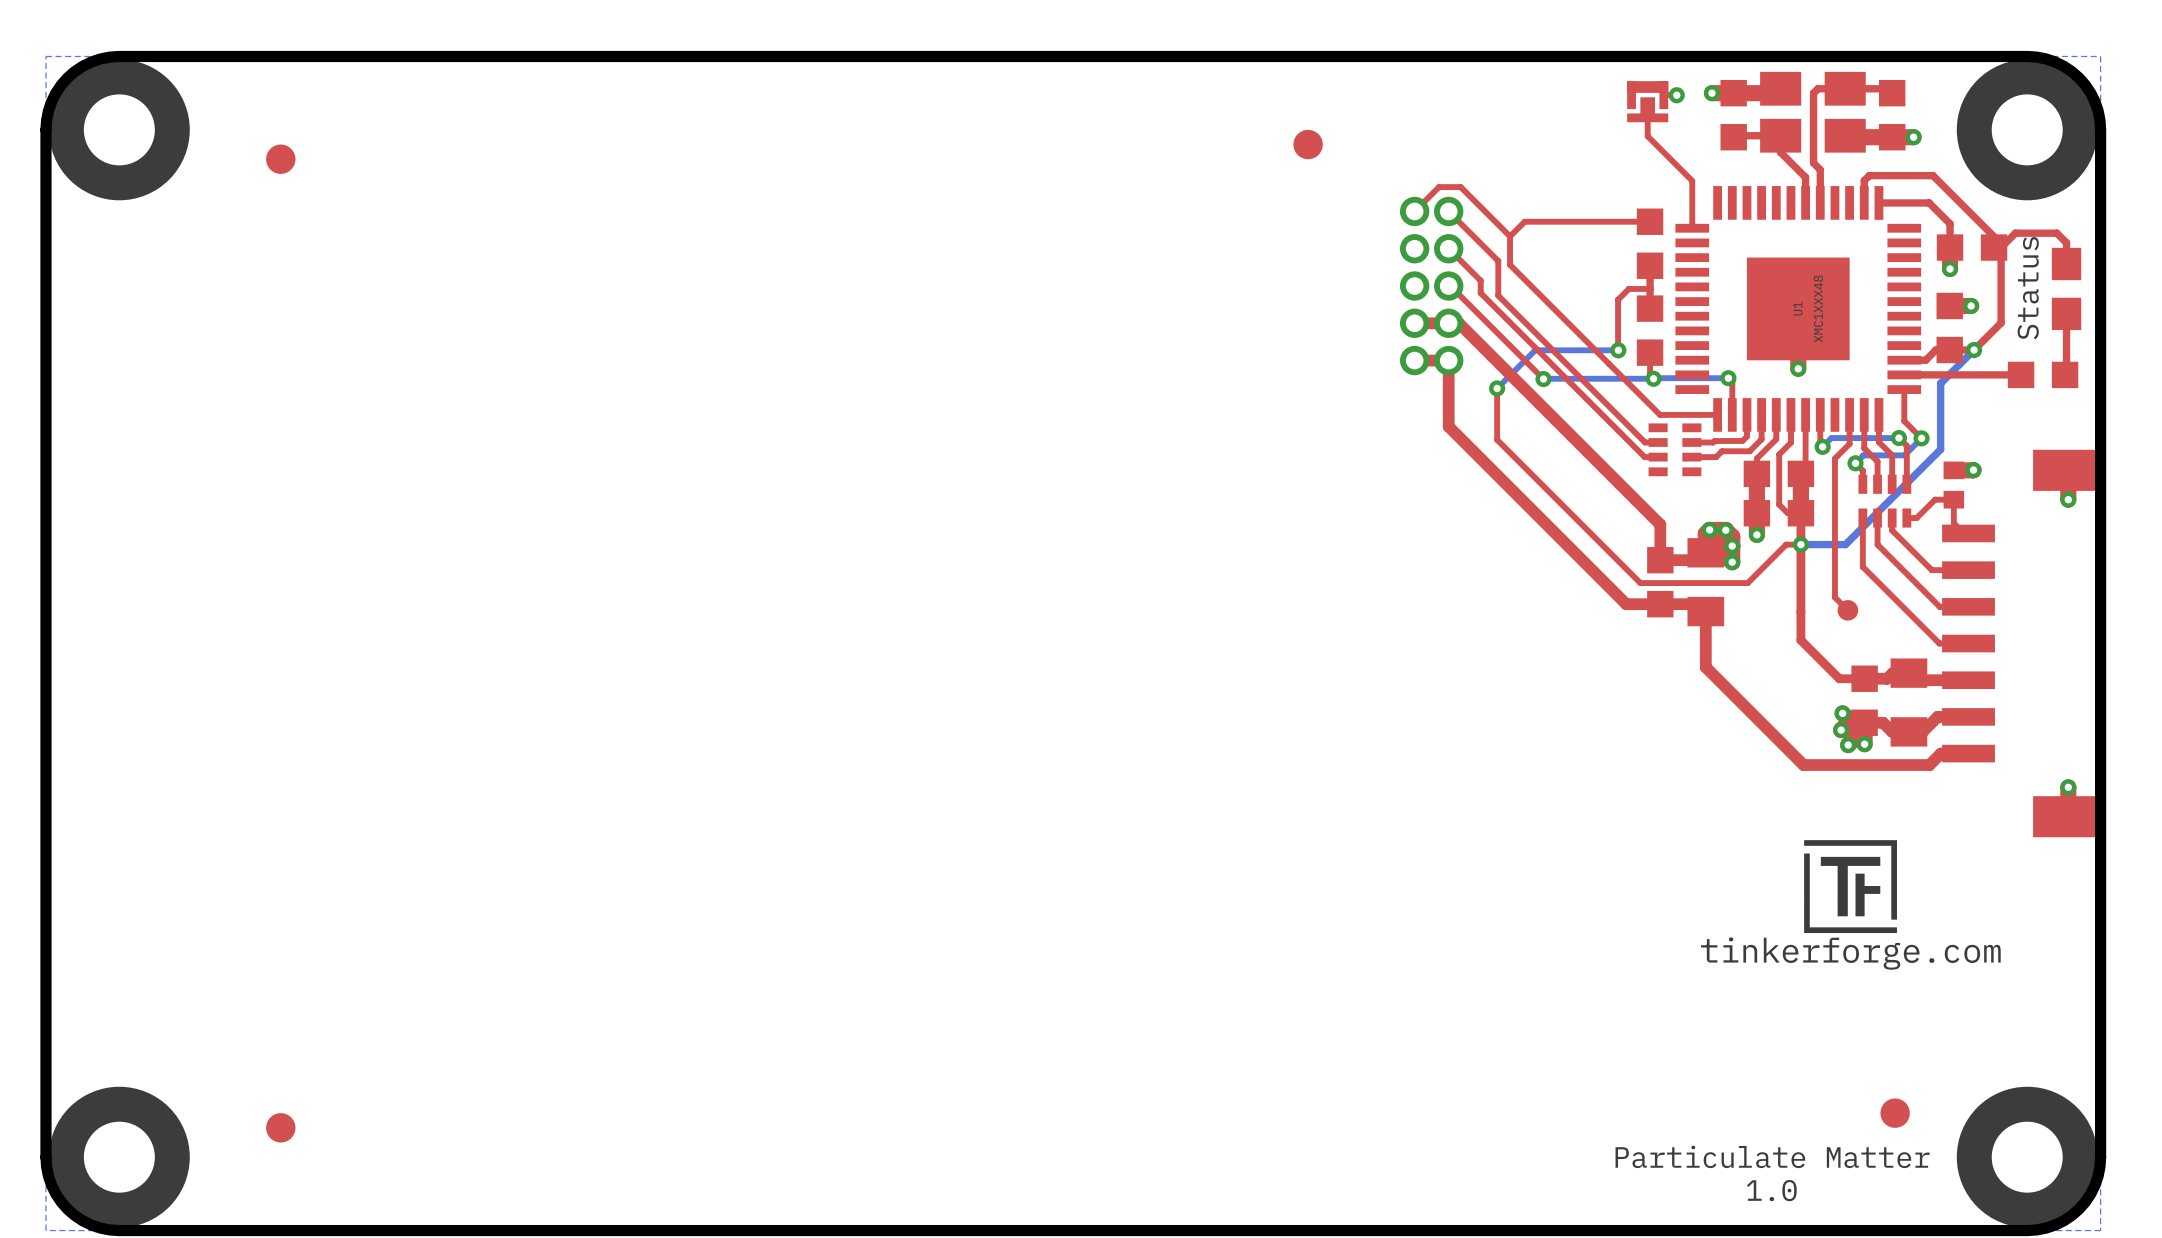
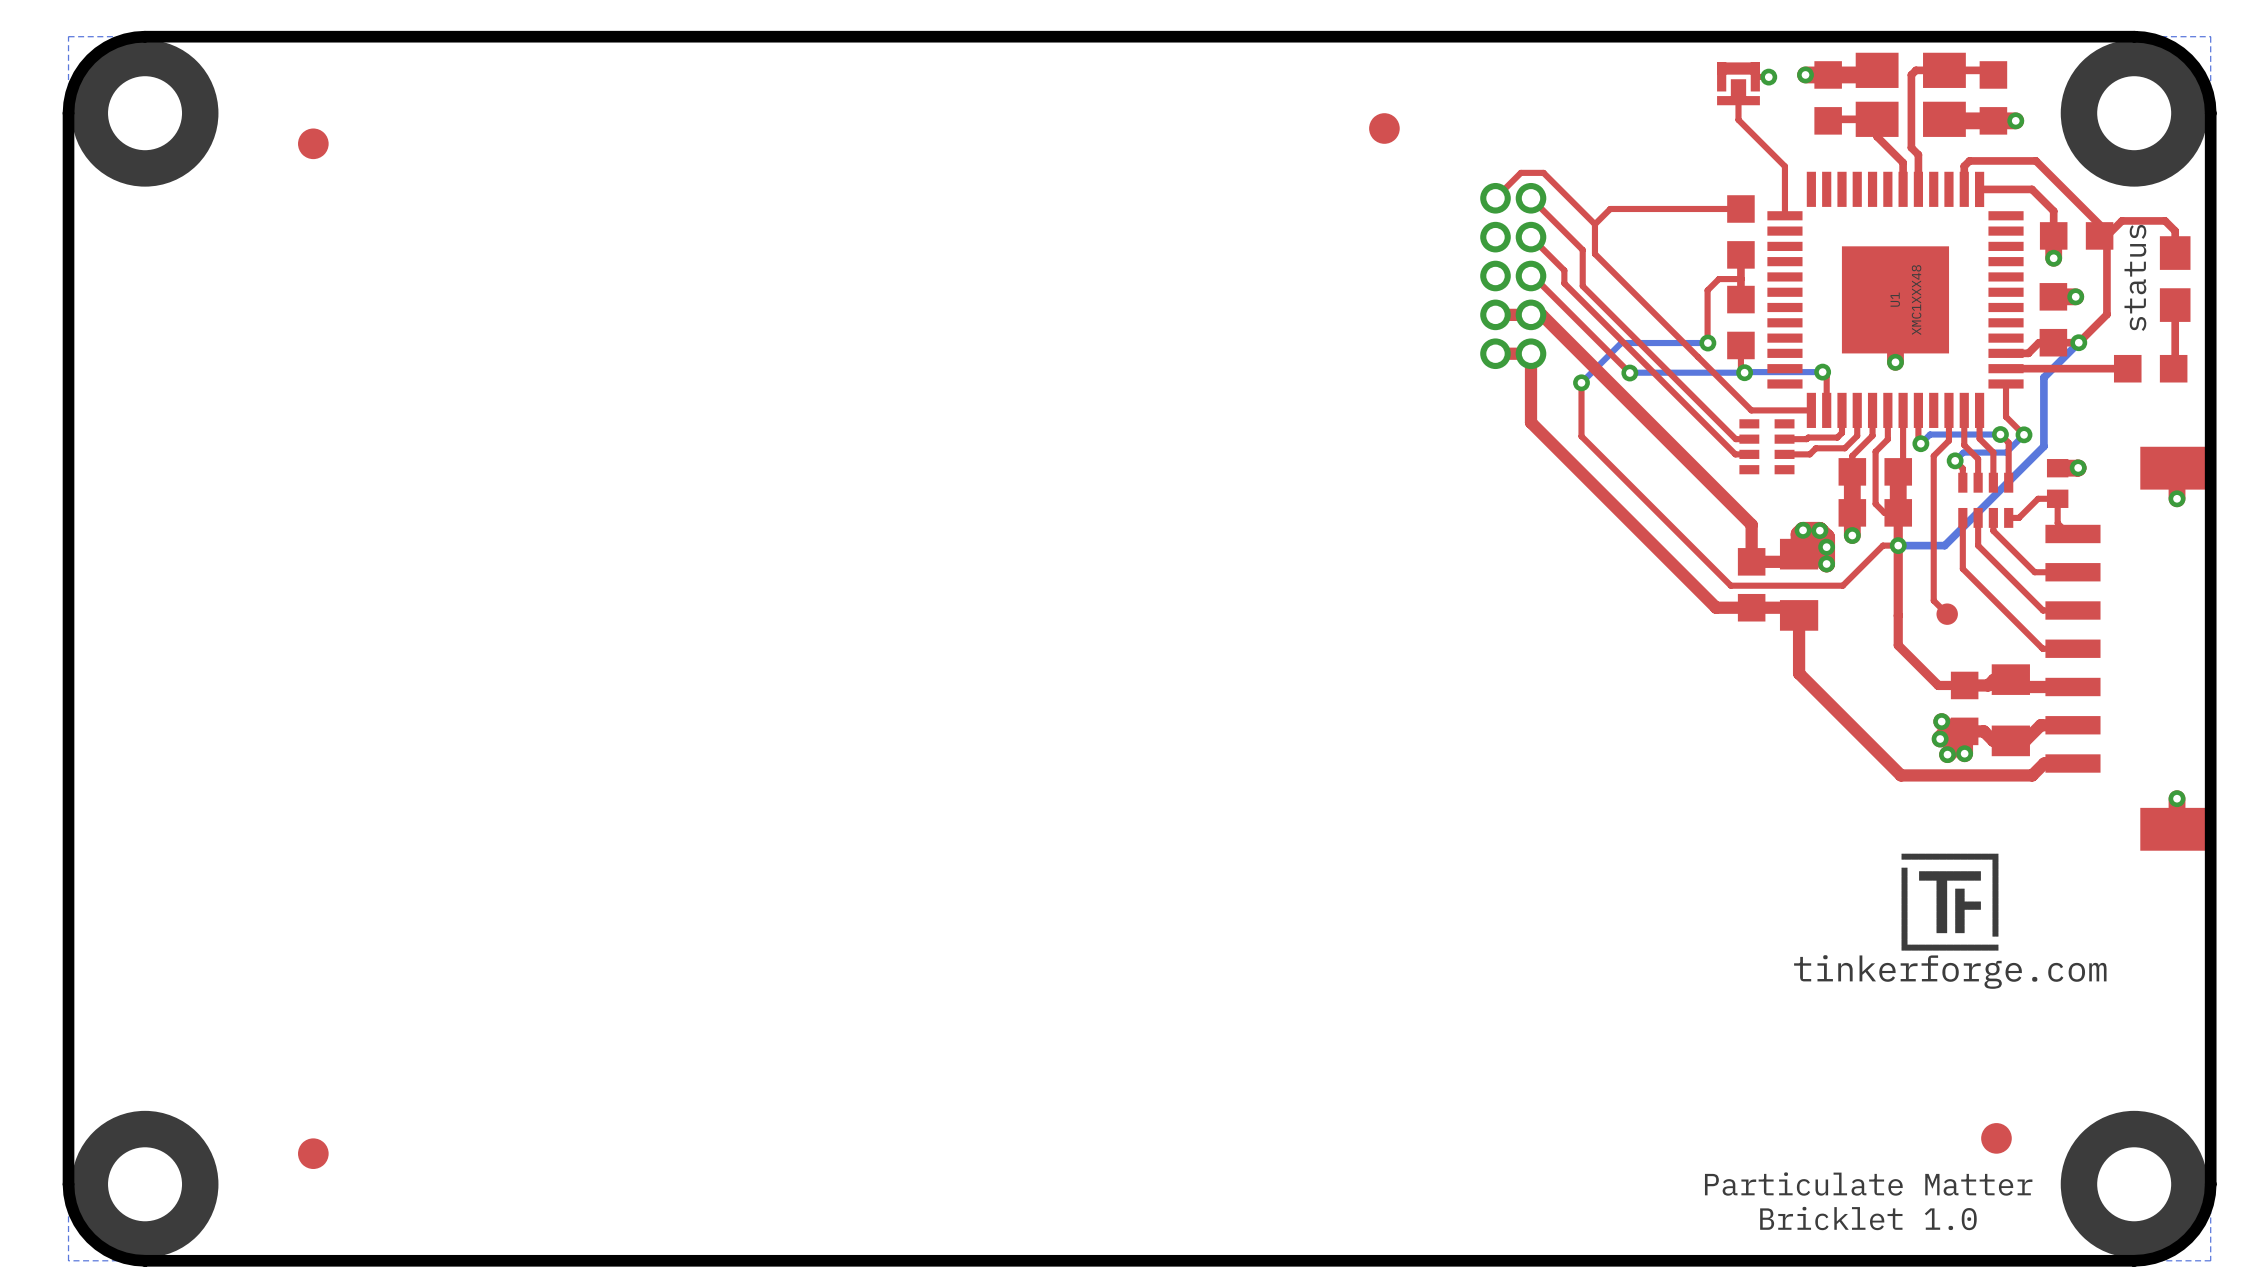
text: Status (2028, 288) -> status (2135, 277)
text: 1.0 (1771, 1190) -> Bricklet 1.0 (1868, 1218)

